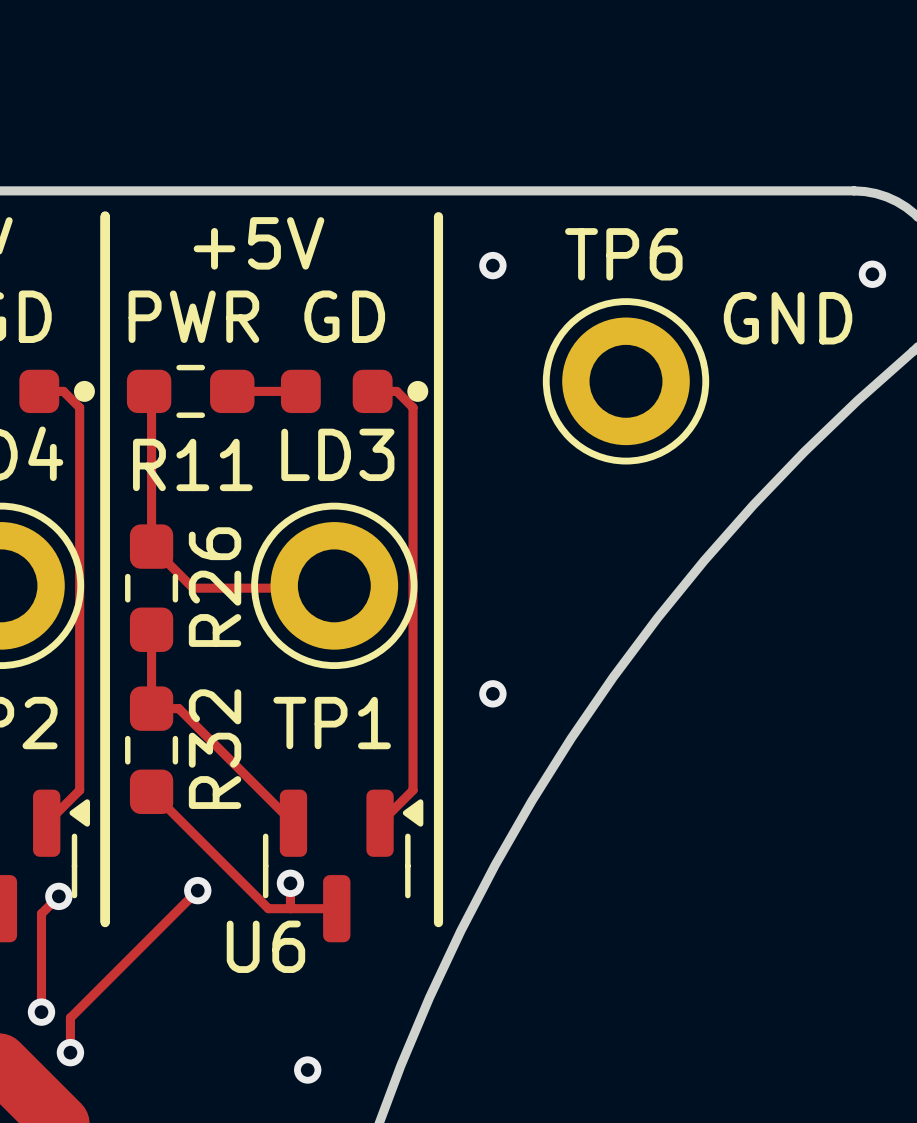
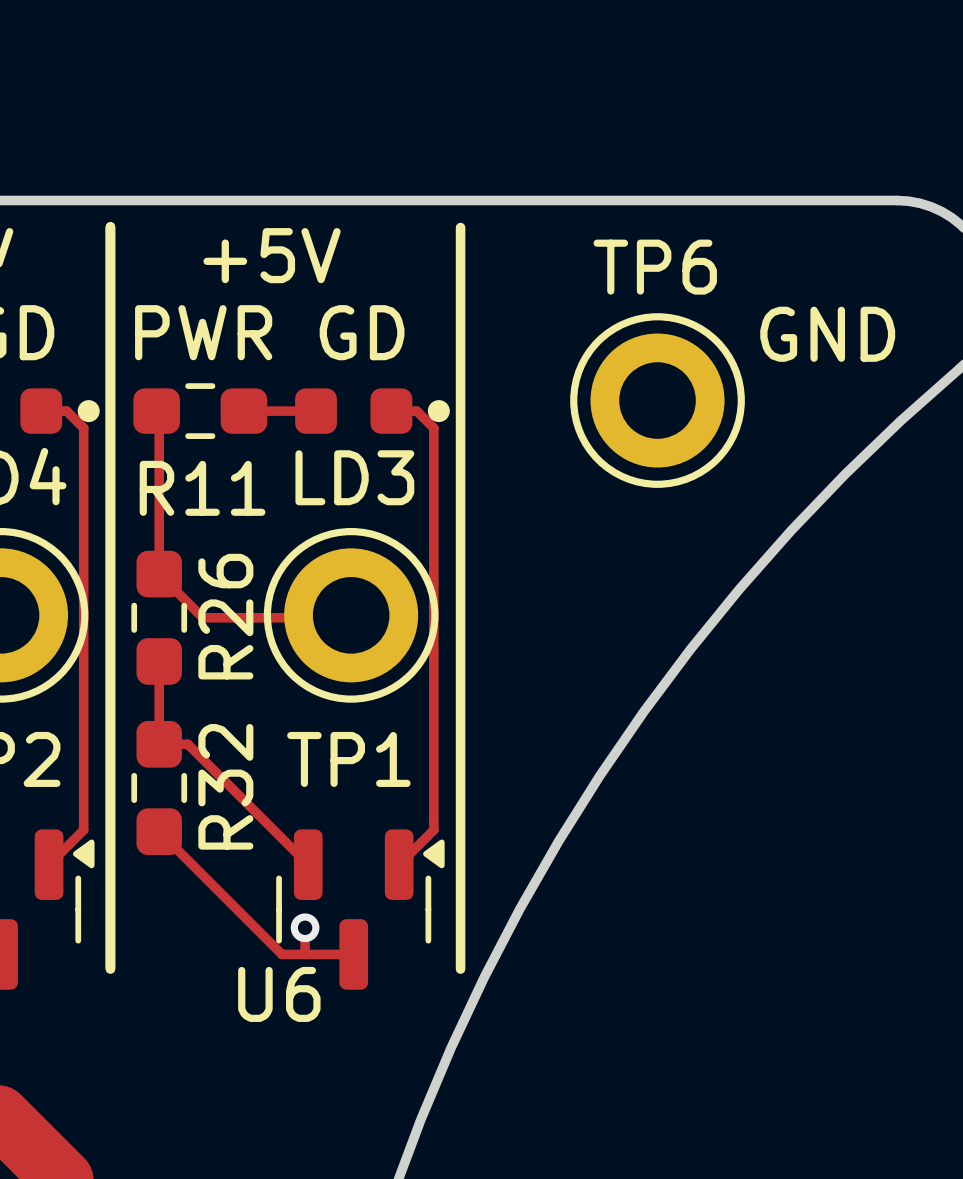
via: (492, 265) -> none
via: (872, 274) -> none
via: (492, 693) -> none
track: (197, 890) (70, 1017) (70, 1052) -> none
via: (197, 890) -> none
track: (58, 896) (41, 913) (41, 1012) -> none
via: (58, 896) -> none
via: (41, 1012) -> none
via: (70, 1052) -> none
via: (307, 1070) -> none

